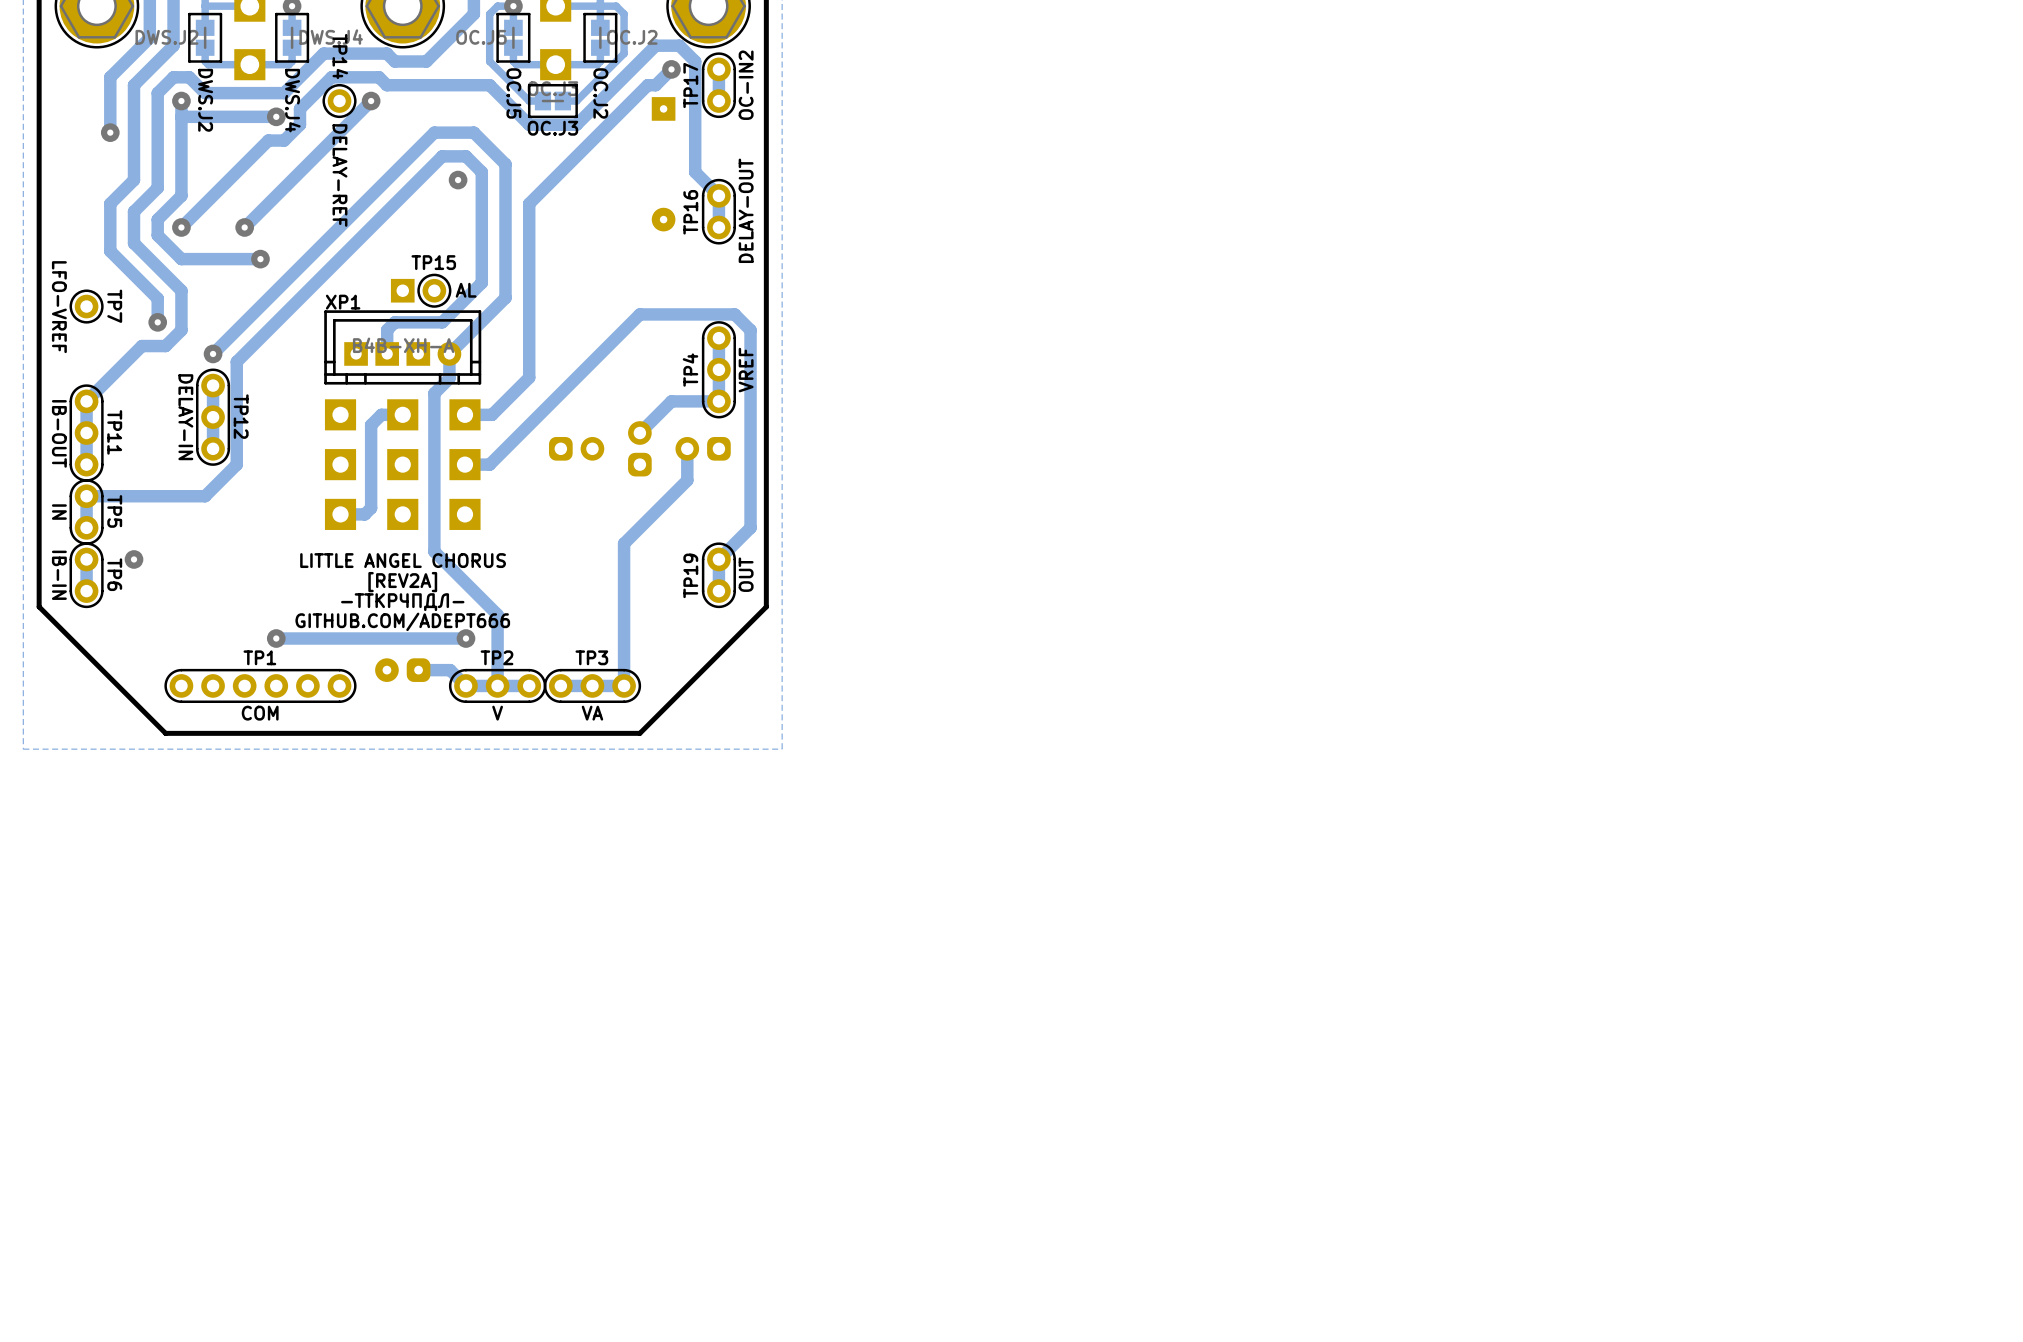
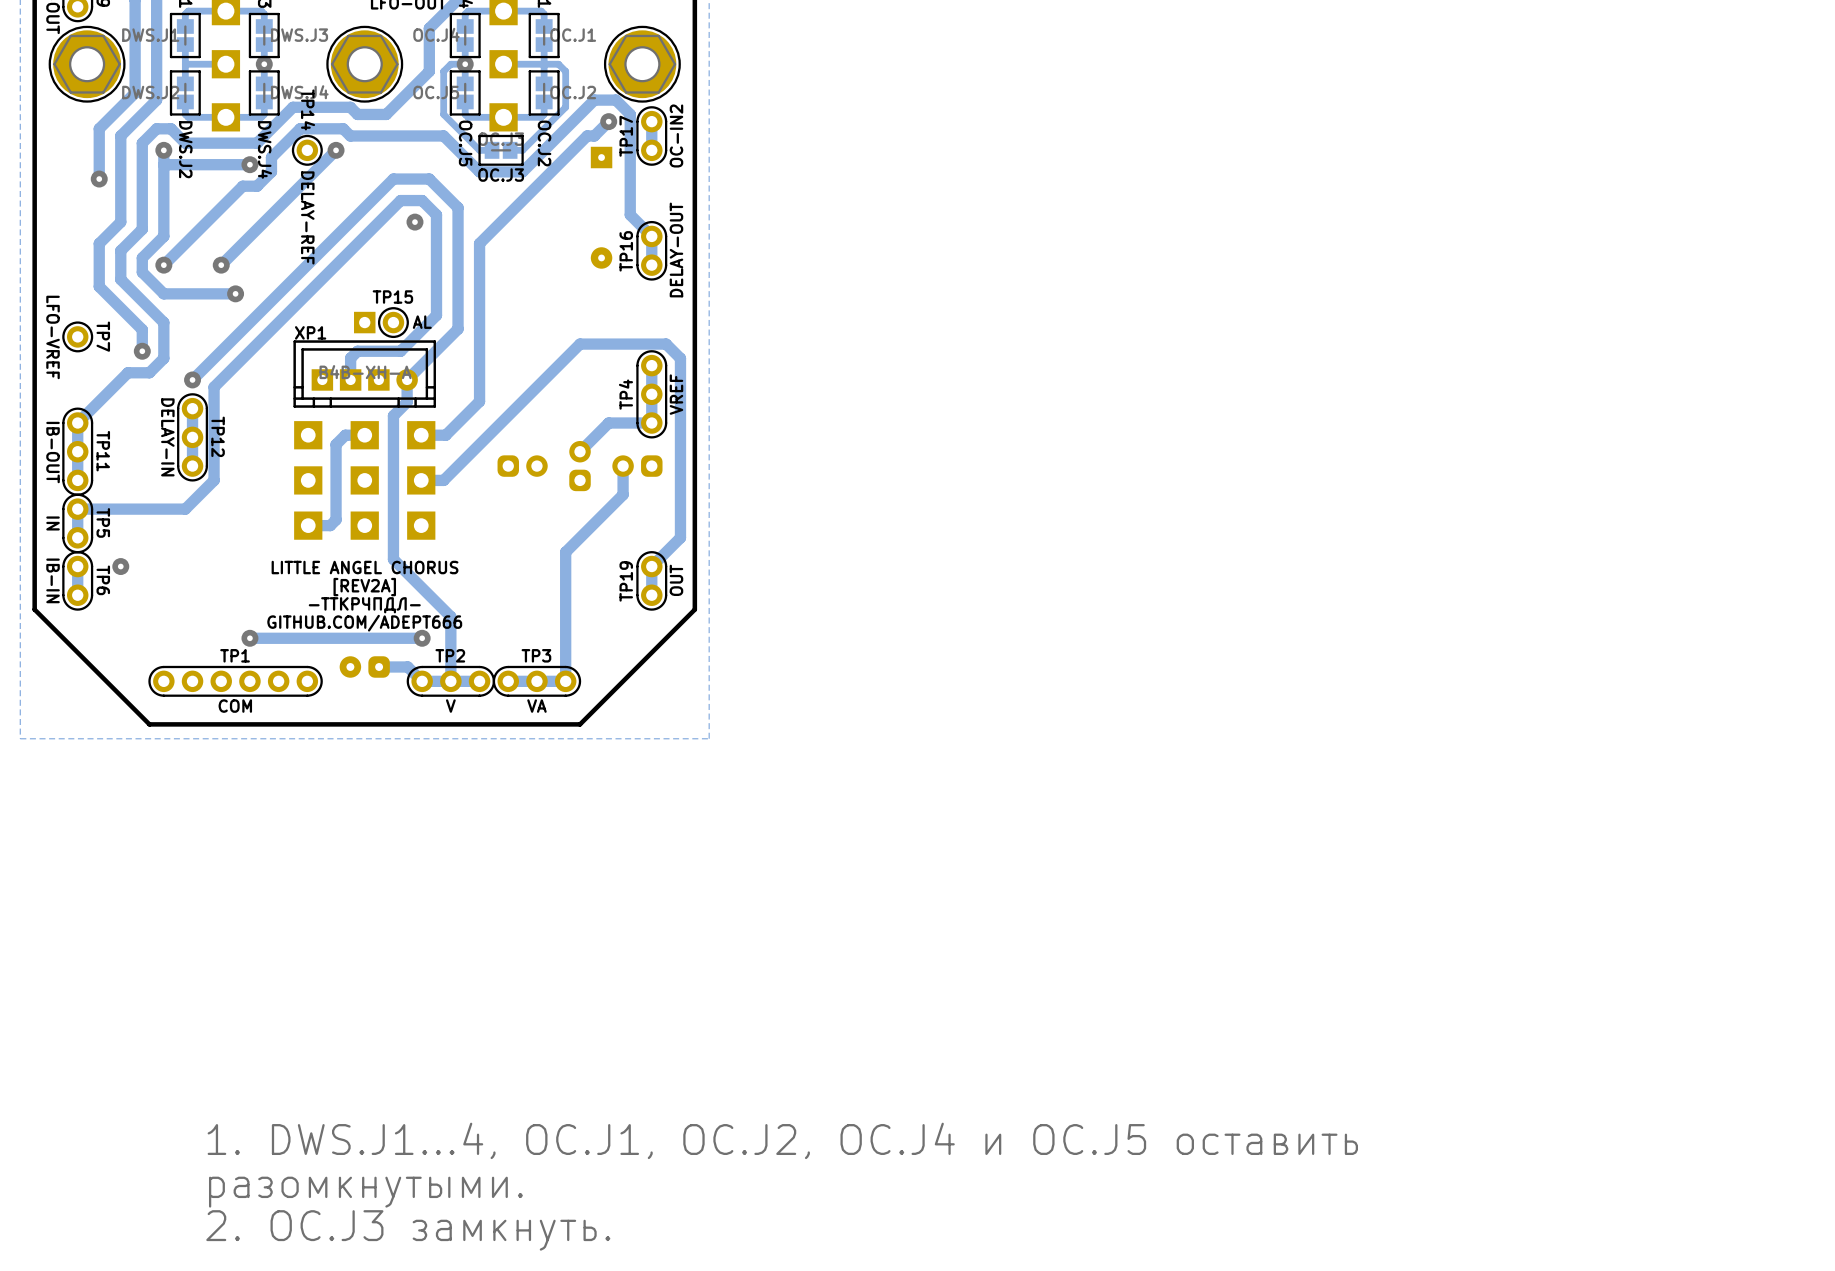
text: none -> 1. DWS.J1...4, OC.J1, OC.J2, OC.J4 и OC.J5 оставить (782, 1140)
text: none -> разомкнутыми. (365, 1192)
text: none -> 2. OC.J3 замкнуть. (408, 1230)

